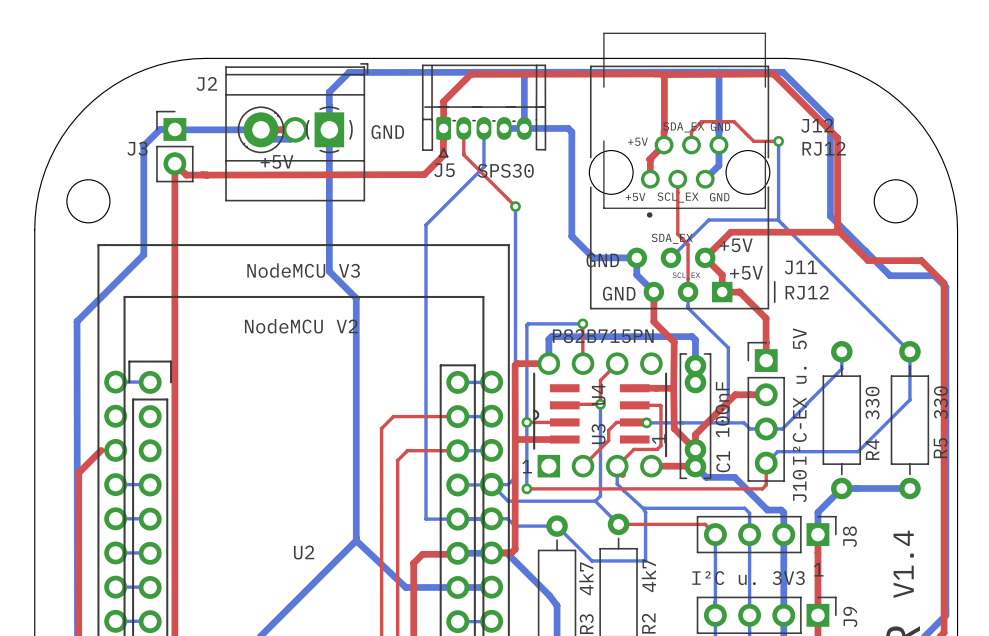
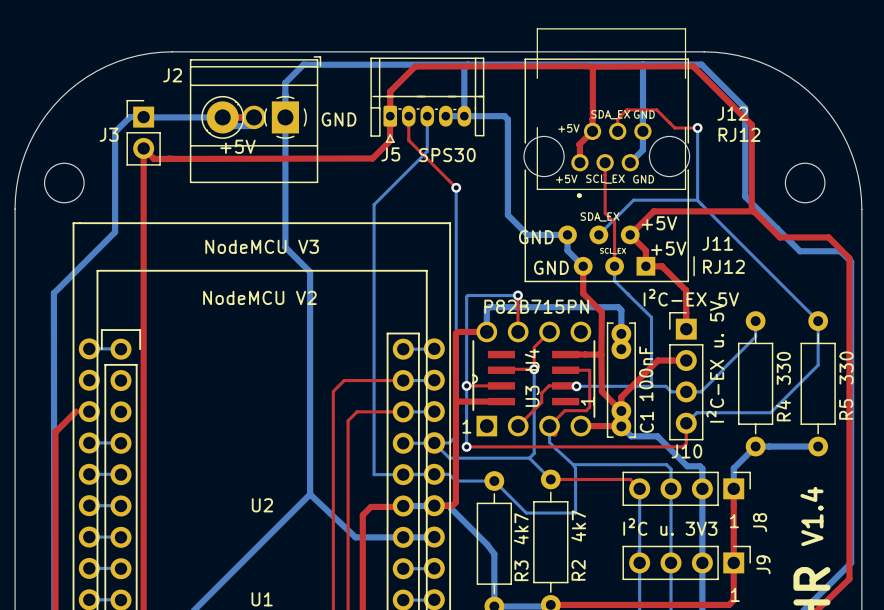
text: none -> I²C-EX 5V (691, 297)
J10 name rotation: 0° (799, 486) -> 90° clockwise (686, 451)
J8 name position: J8 (849, 536) -> J8 (760, 522)

